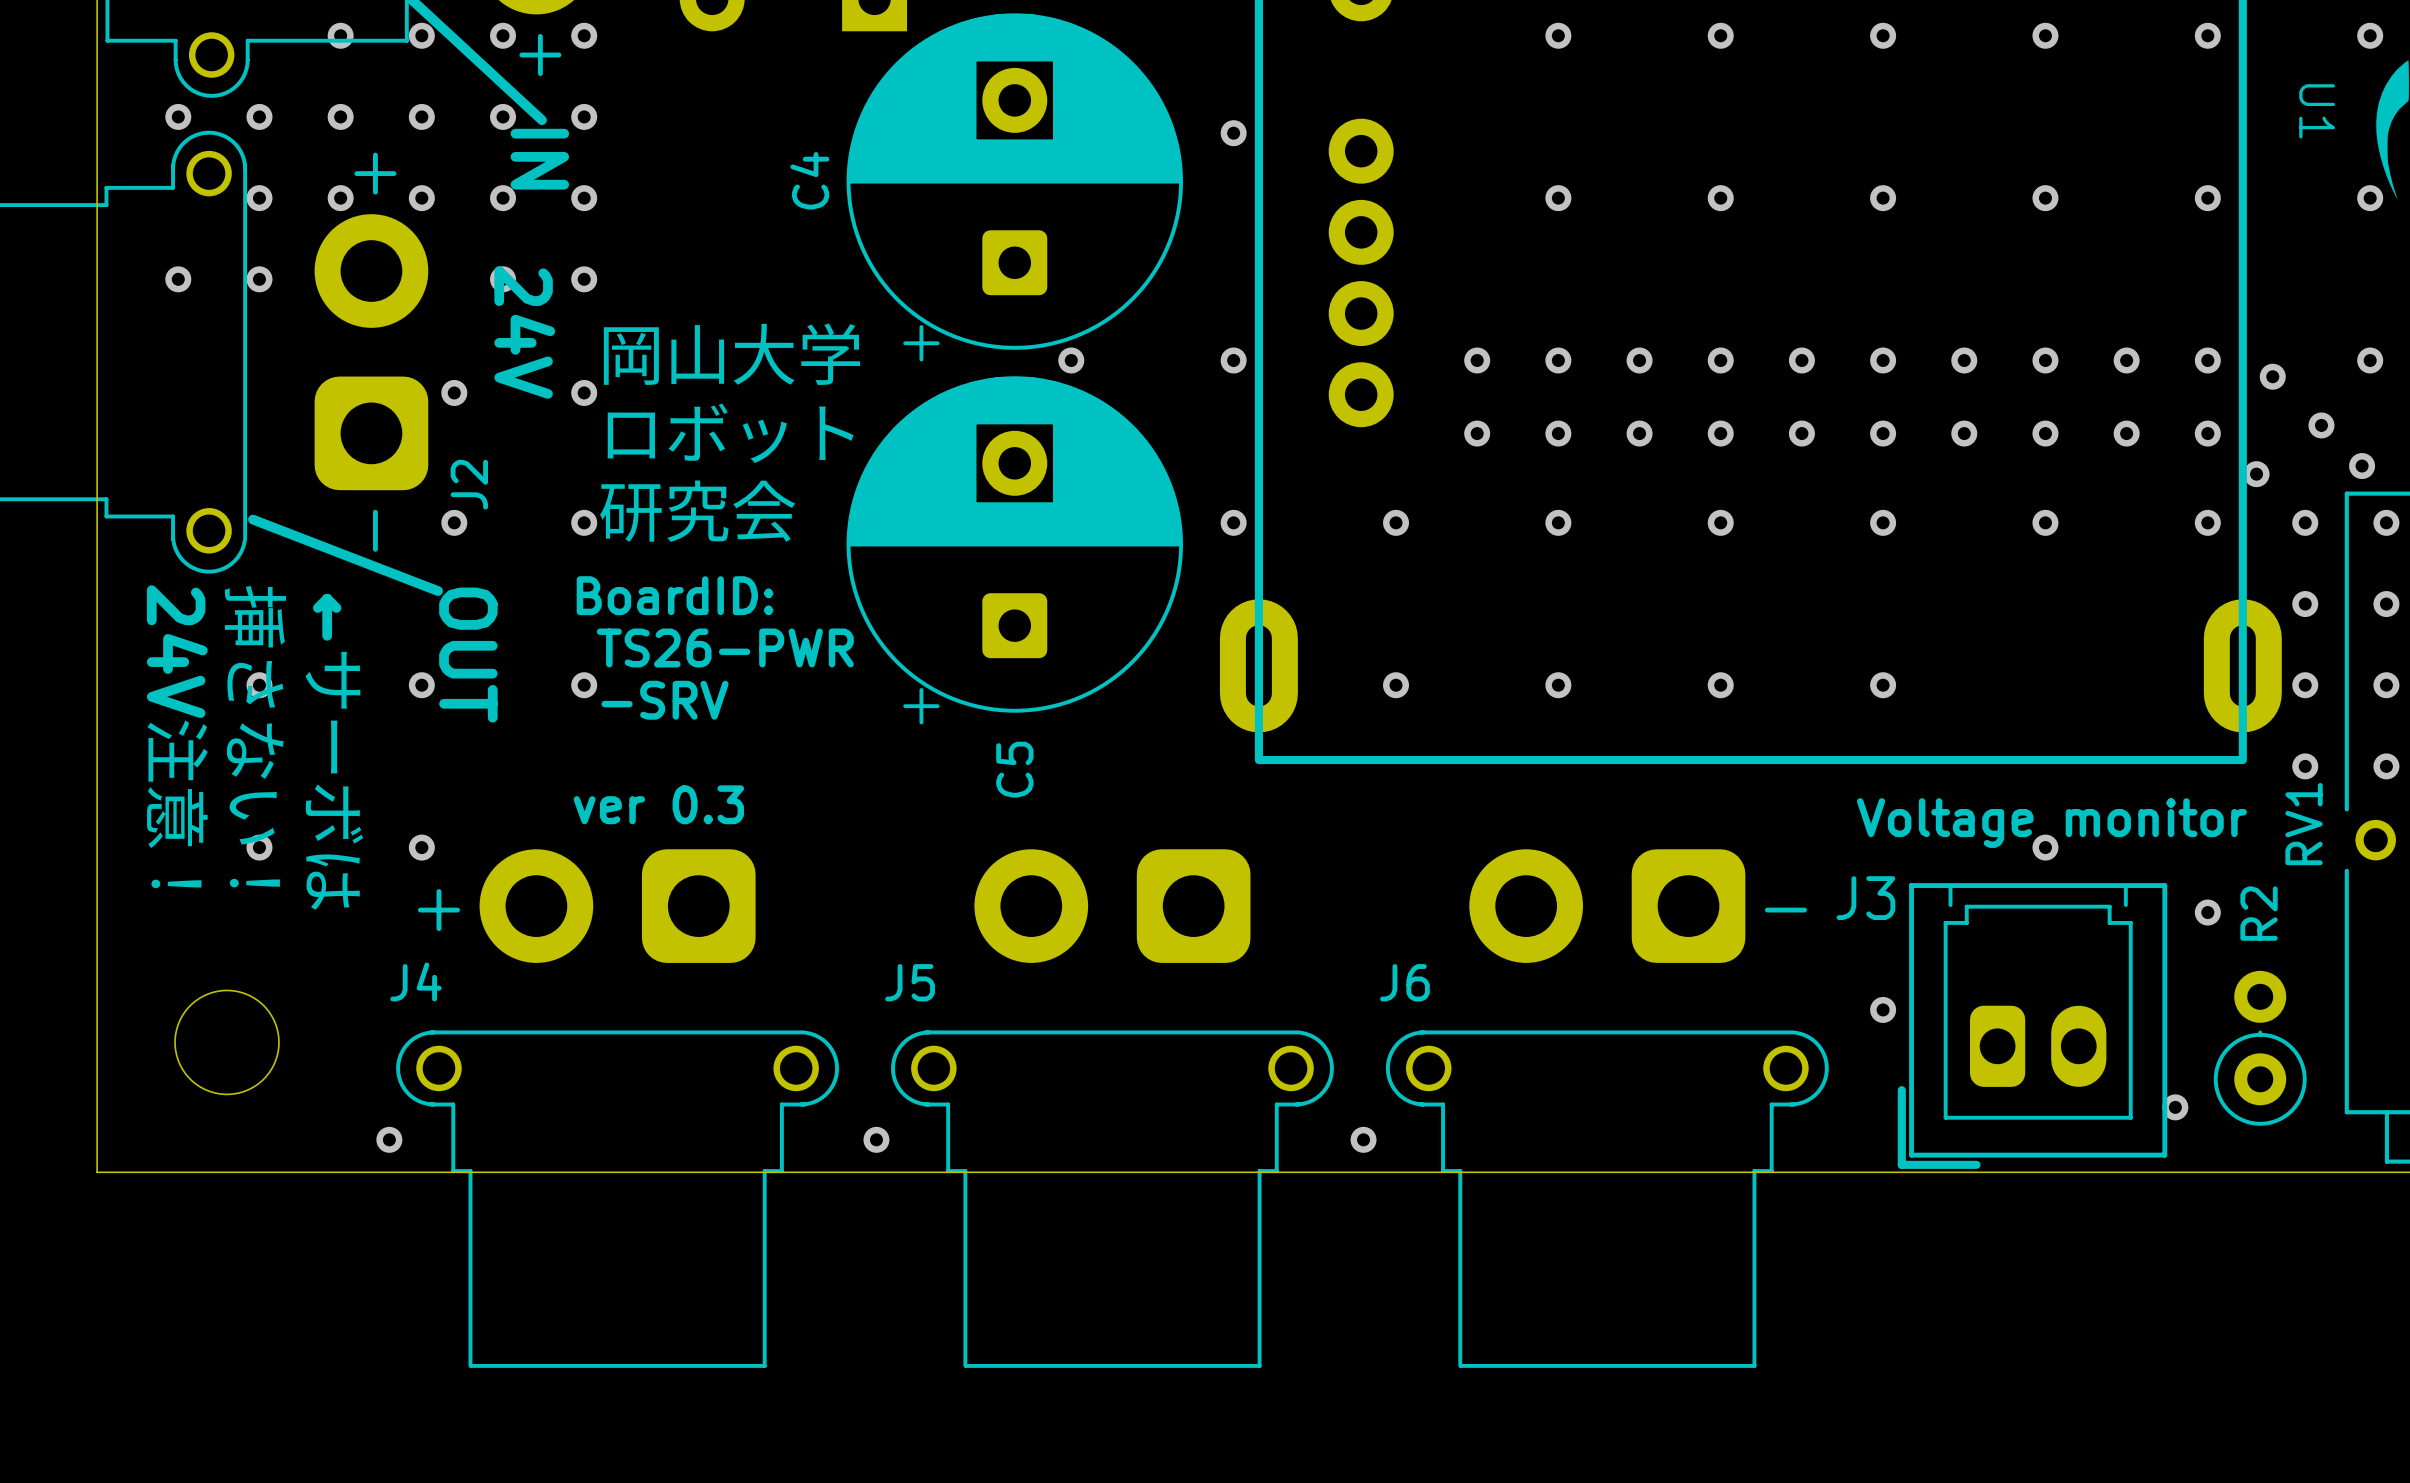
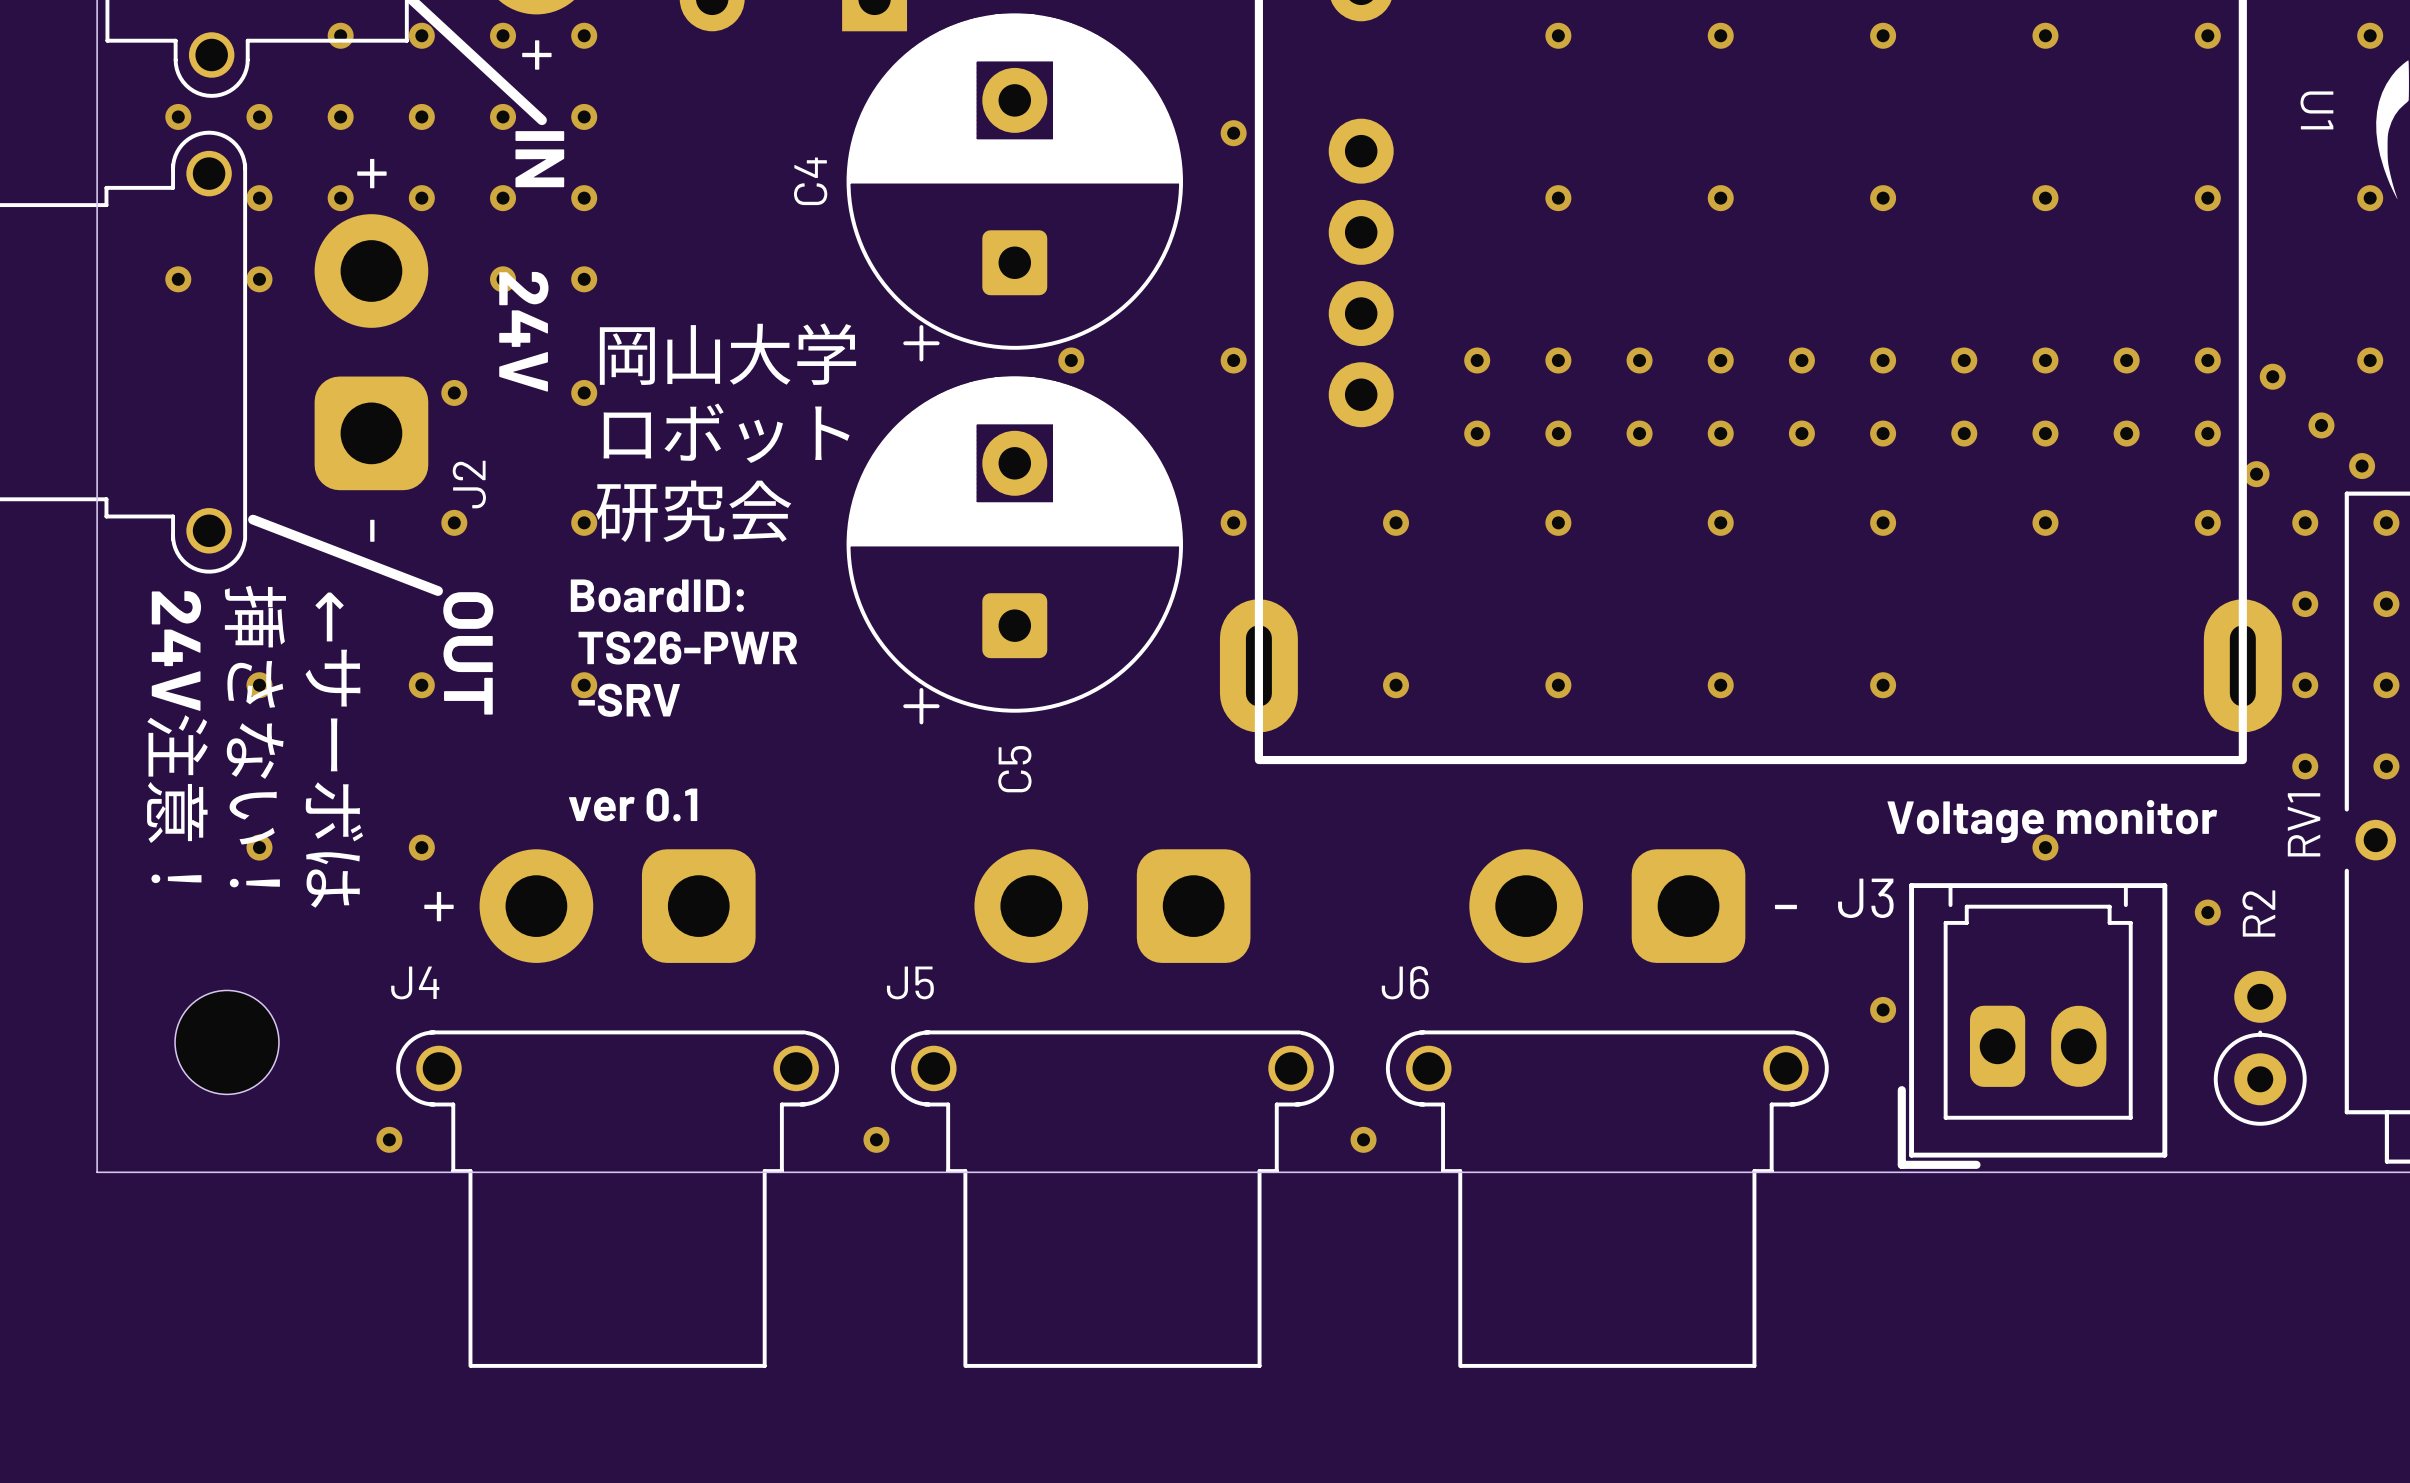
text: ver 0.3 (658, 804) -> ver 0.1 (633, 804)
via: (2175, 1107) -> none

